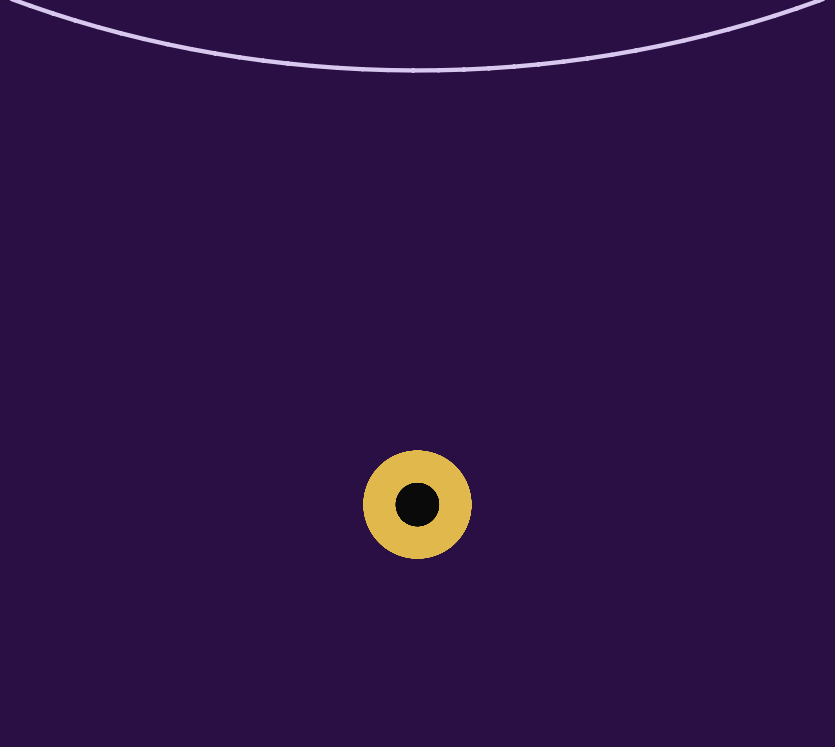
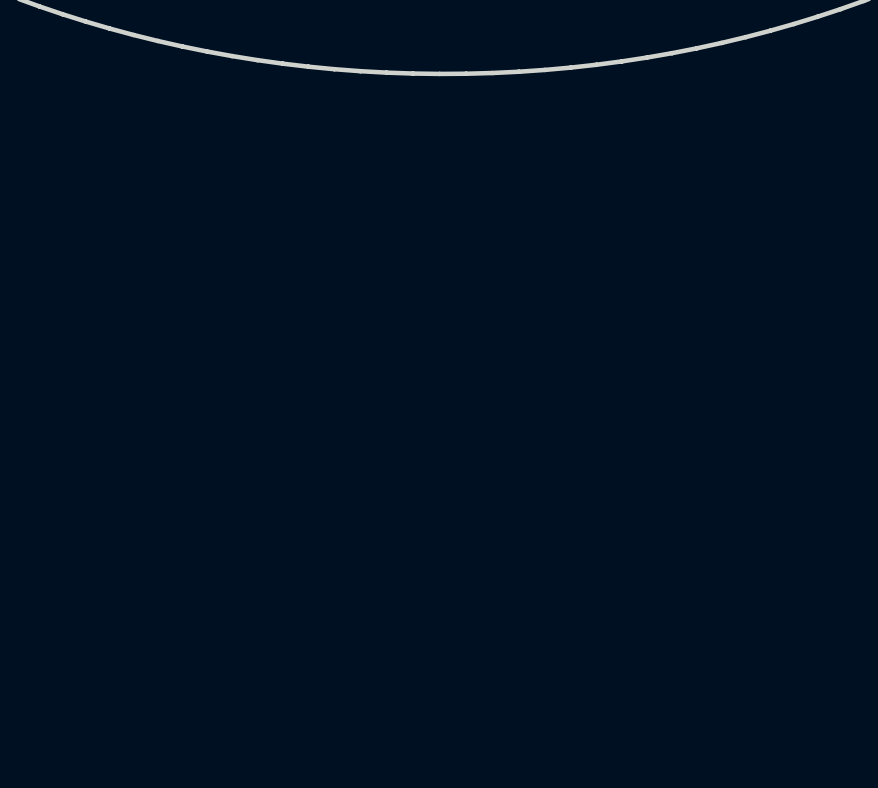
part: (417, 504) -> none

